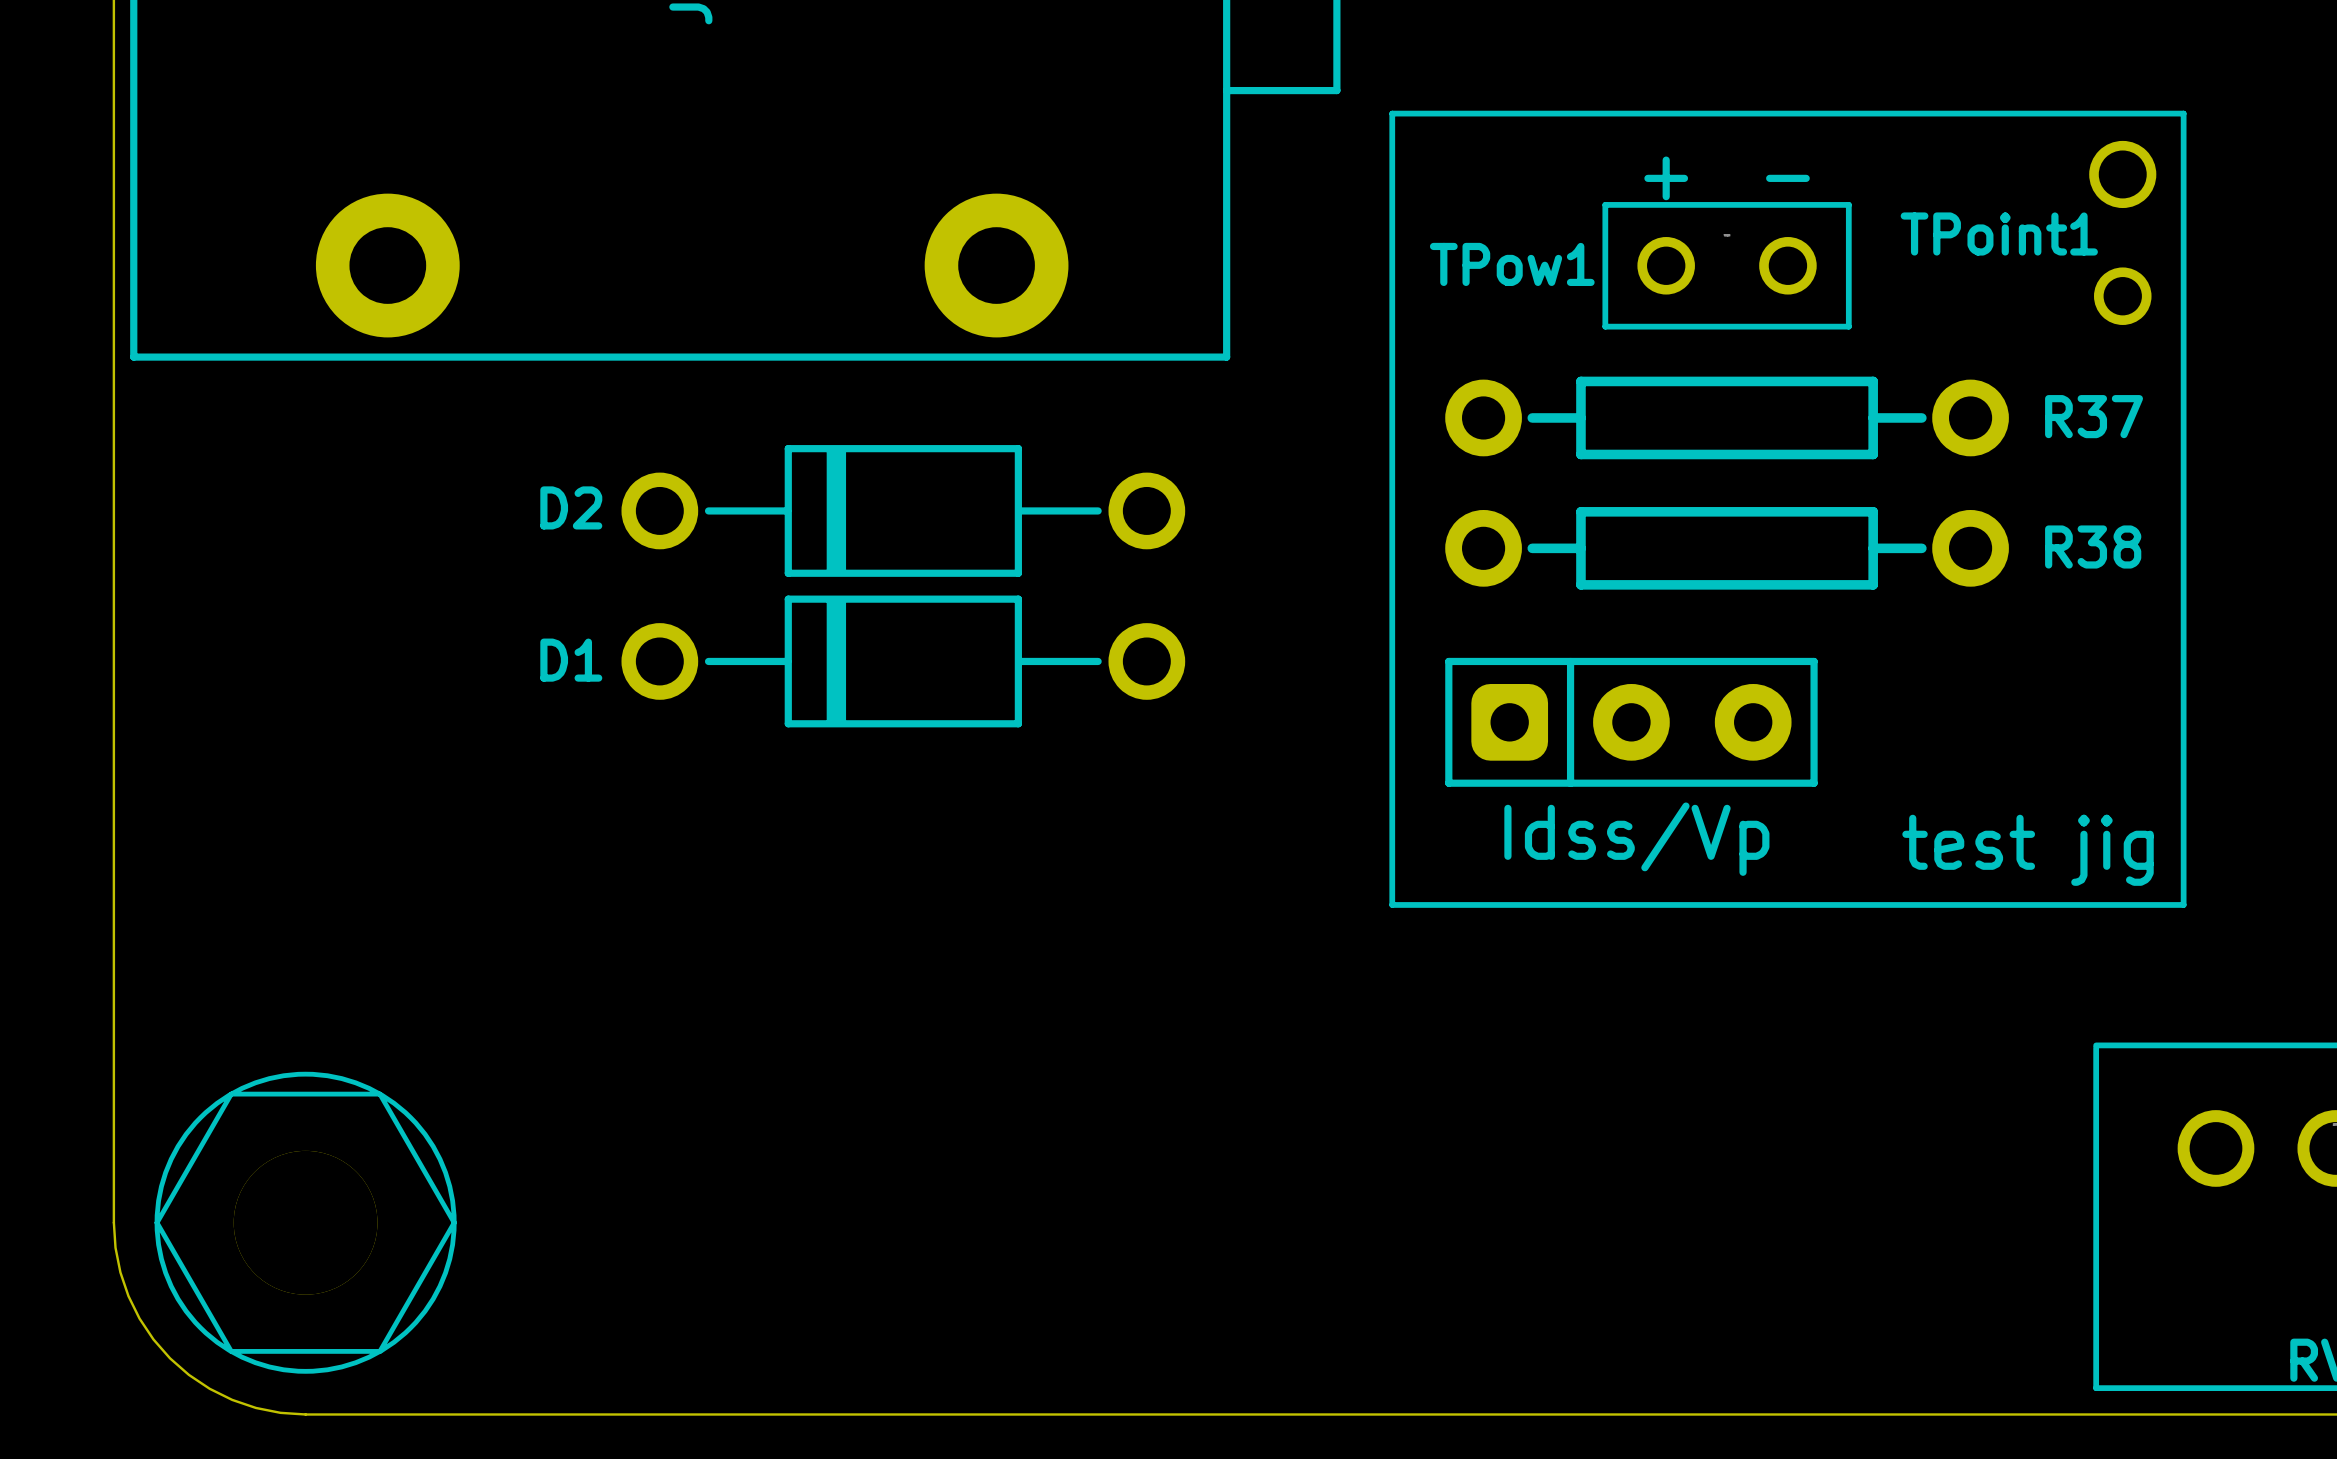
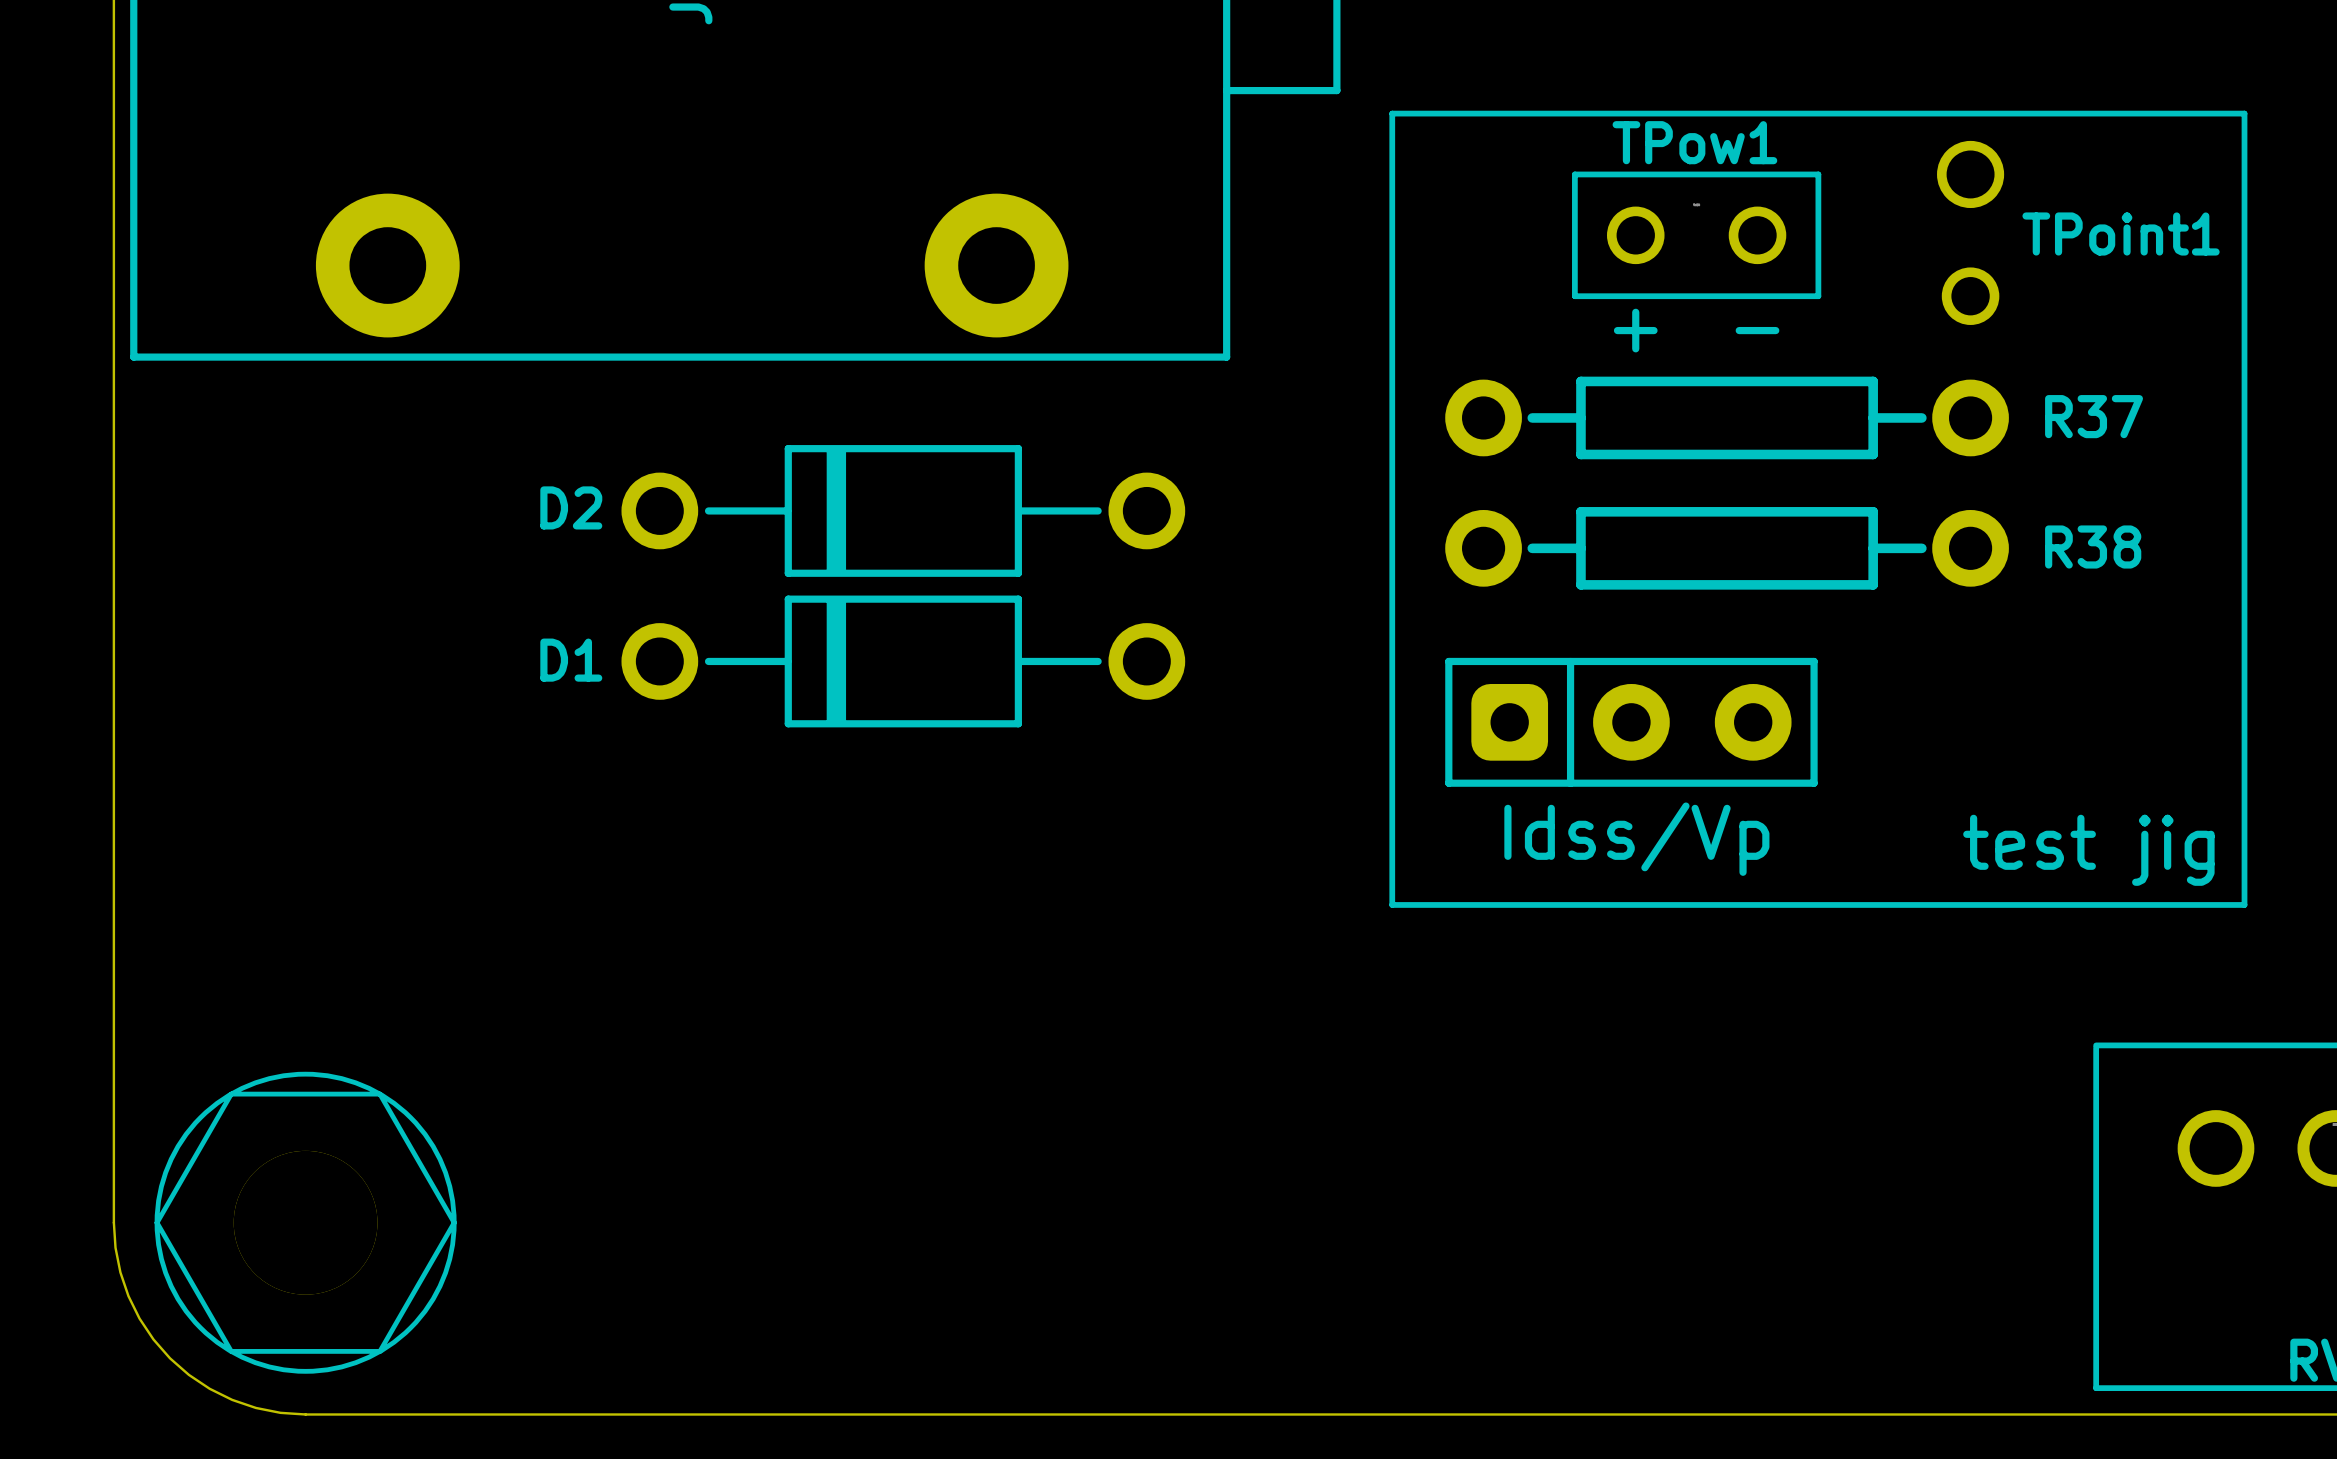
line: (2183, 113) (2183, 904) -> (2183, 113) (2244, 113) (2244, 904) (2183, 904)
TPow1 text position: + (1666, 178) -> + (1635, 330)
TPow1 text position: - (1787, 178) -> - (1757, 330)
TPoint1 position: (2122, 232) -> (1970, 232)
TPoint1 name position: TPoint1 (1999, 233) -> TPoint1 (2121, 233)
TPow1 name position: TPow1 (1512, 264) -> TPow1 (1694, 142)
TPow1 position: (1727, 265) -> (1696, 235)
text position: test jig (2028, 850) -> test jig (2088, 850)

